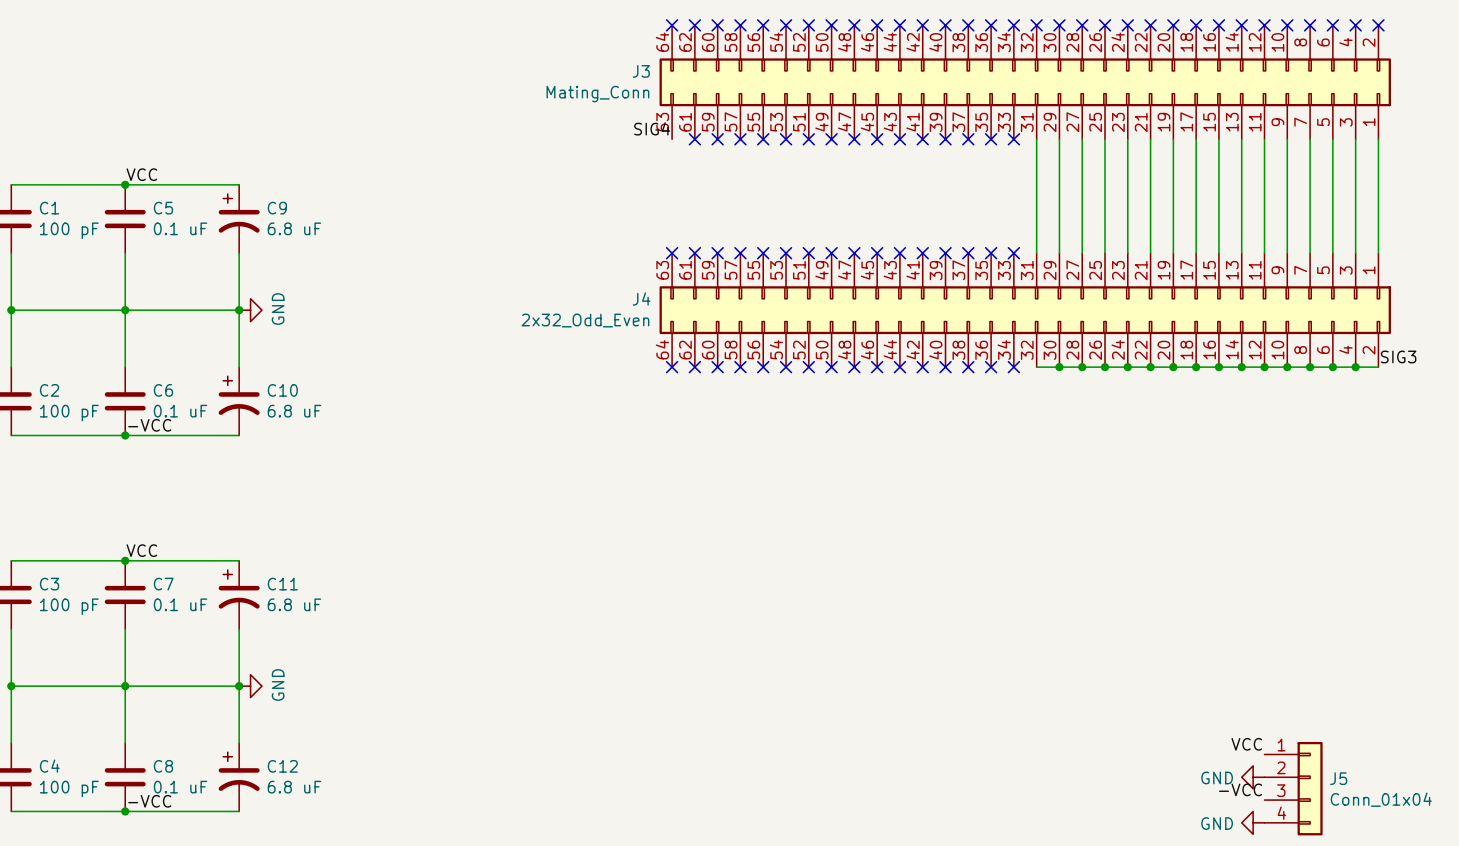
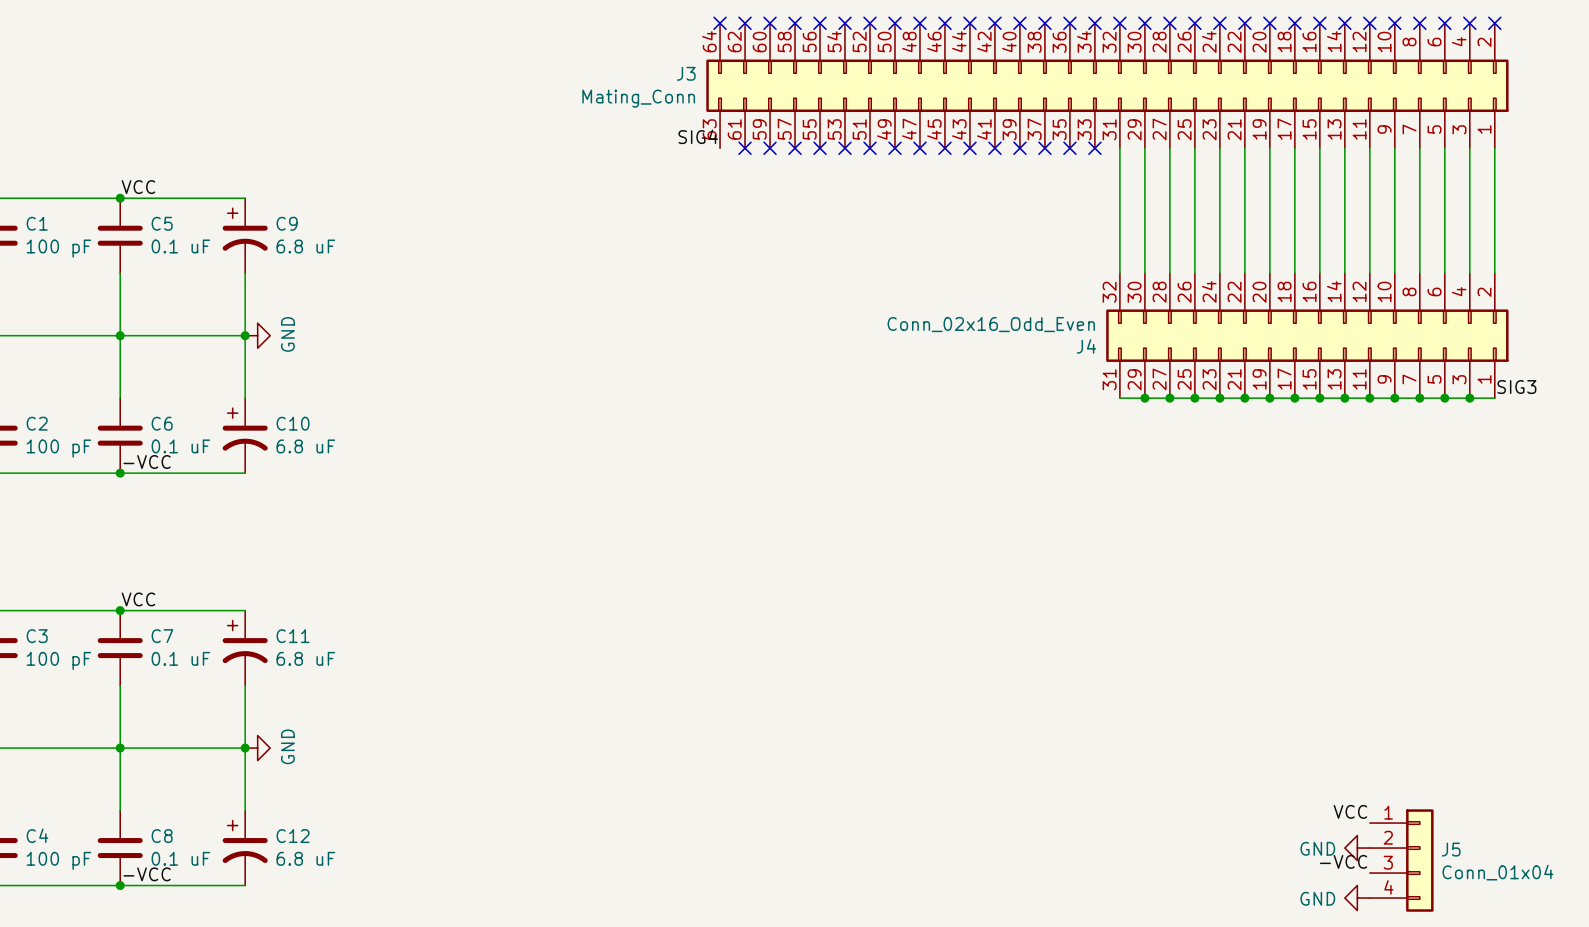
J4 symbol: [659, 253, 1391, 368] -> [1106, 273, 1509, 399]
no-connect mark: (672, 253) -> none
no-connect mark: (694, 253) -> none
no-connect mark: (717, 253) -> none
no-connect mark: (740, 253) -> none
no-connect mark: (763, 253) -> none
no-connect mark: (786, 253) -> none
no-connect mark: (808, 253) -> none
no-connect mark: (831, 253) -> none
no-connect mark: (854, 253) -> none
no-connect mark: (877, 253) -> none
no-connect mark: (899, 253) -> none
no-connect mark: (922, 253) -> none
no-connect mark: (945, 253) -> none
no-connect mark: (968, 253) -> none
no-connect mark: (991, 253) -> none
no-connect mark: (1013, 253) -> none
J4 name position: J4 (641, 298) -> J4 (1086, 346)
J4 value: 2x32_Odd_Even (585, 320) -> Conn_02x16_Odd_Even (991, 324)
no-connect mark: (672, 367) -> none
no-connect mark: (694, 367) -> none
no-connect mark: (717, 367) -> none
no-connect mark: (740, 367) -> none
no-connect mark: (763, 367) -> none
no-connect mark: (786, 367) -> none
no-connect mark: (808, 367) -> none
no-connect mark: (831, 367) -> none
no-connect mark: (854, 367) -> none
no-connect mark: (877, 367) -> none
no-connect mark: (899, 367) -> none
no-connect mark: (922, 367) -> none
no-connect mark: (945, 367) -> none
no-connect mark: (968, 367) -> none
no-connect mark: (991, 367) -> none
no-connect mark: (1013, 367) -> none

